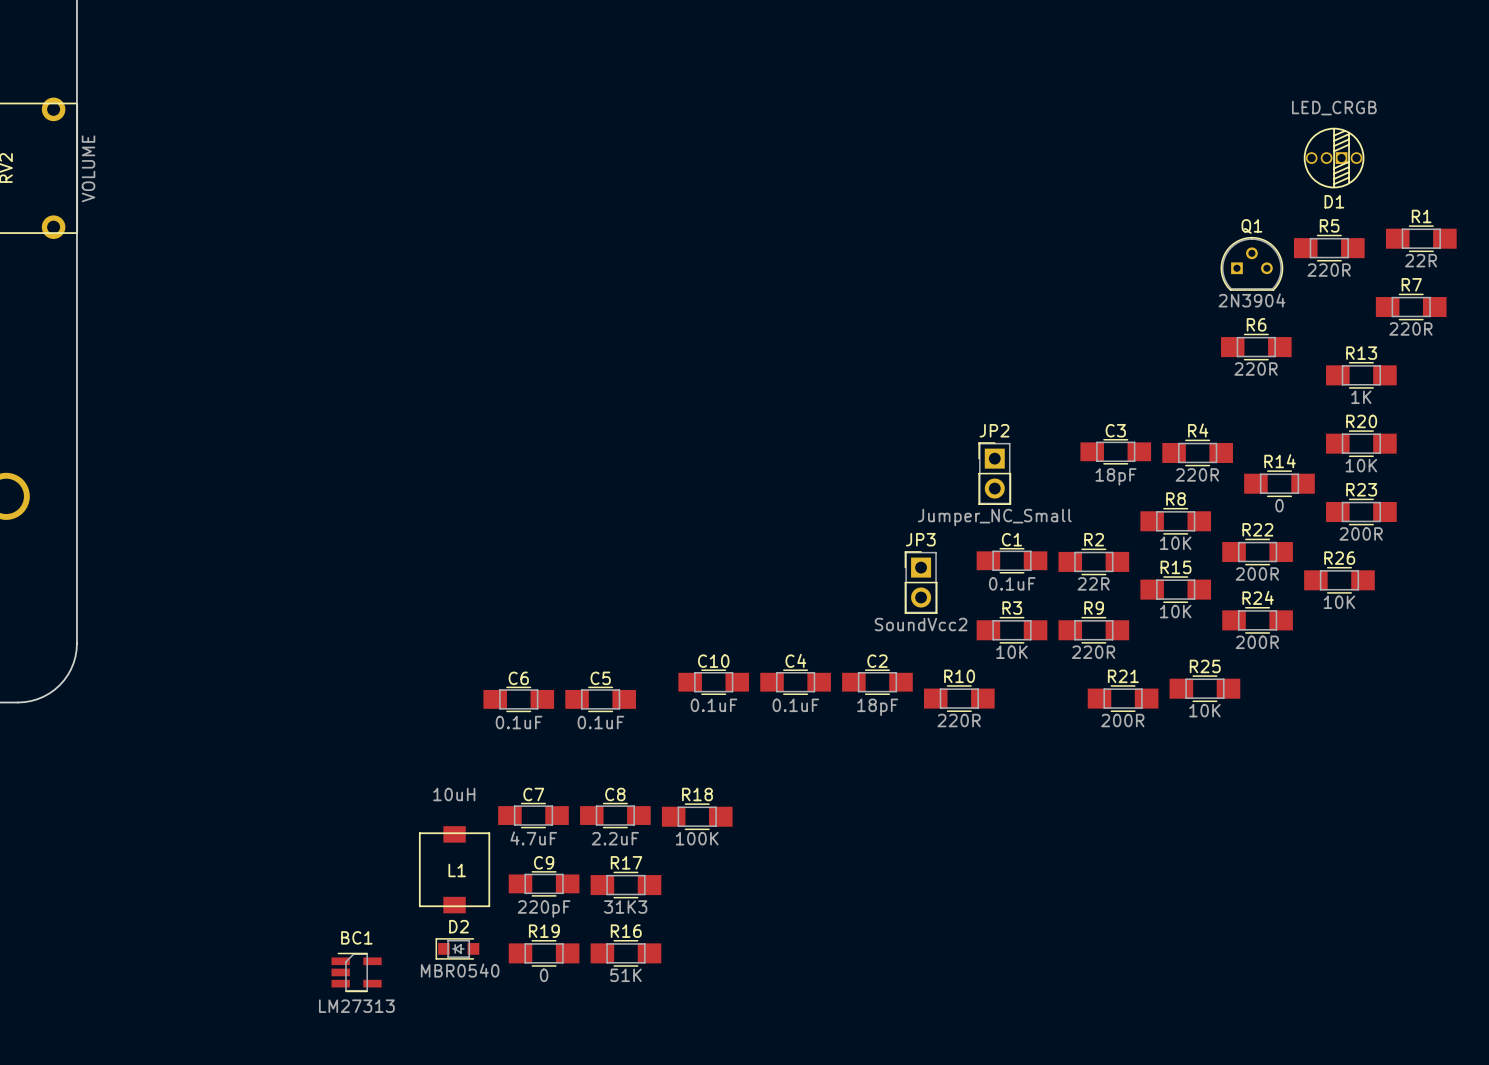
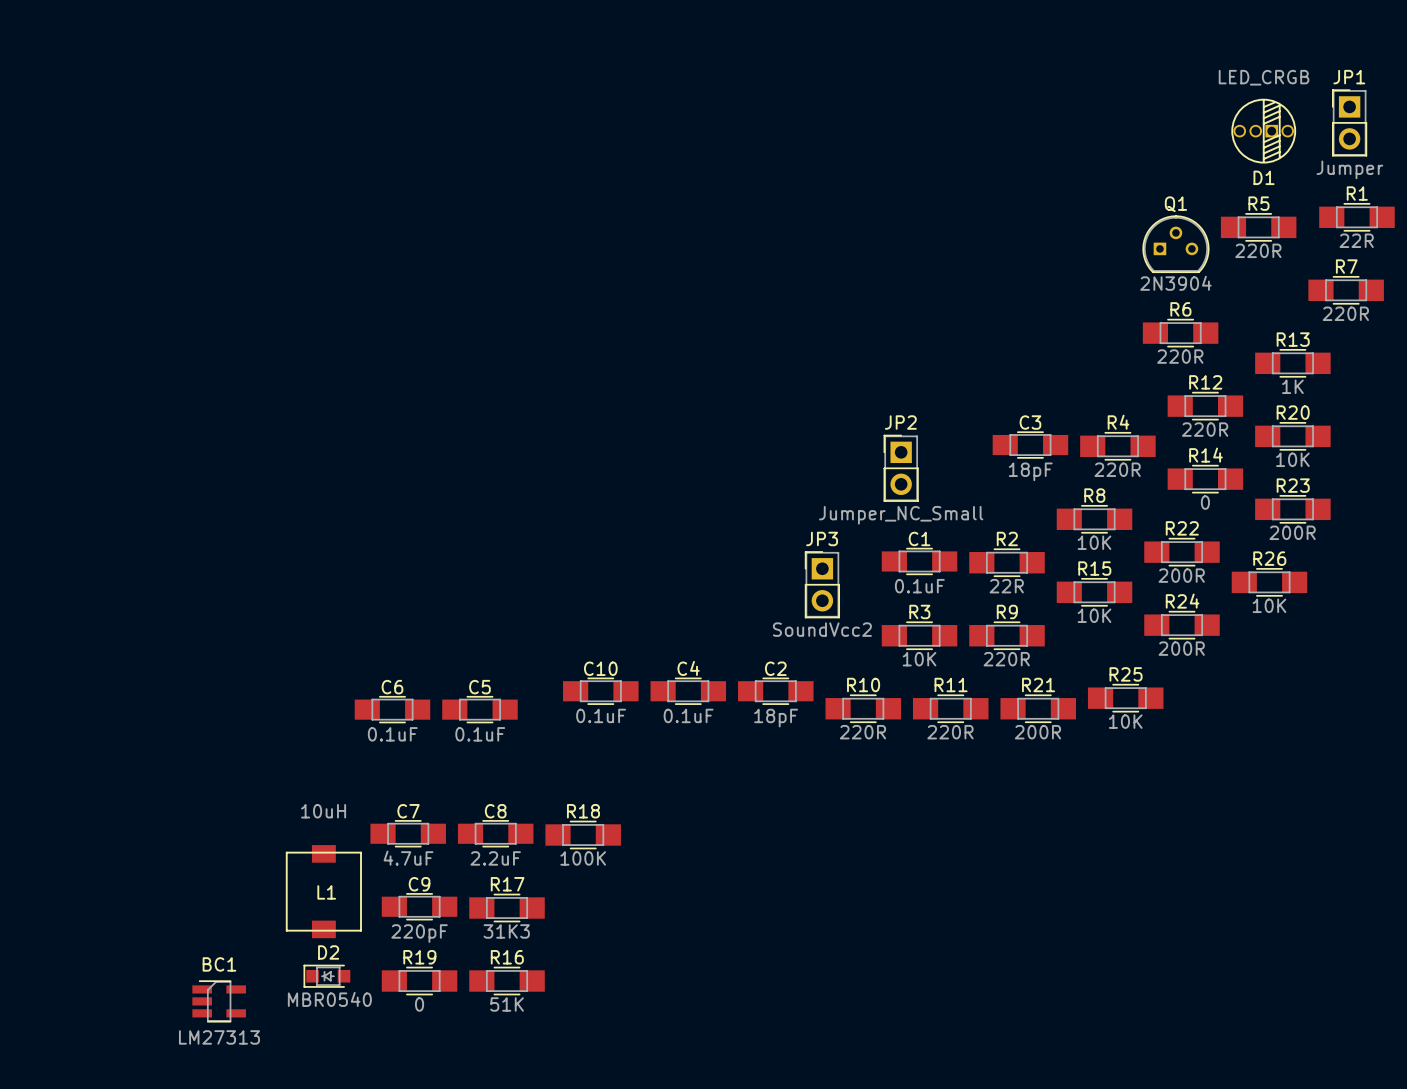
JP1: none -> Jumper (1349, 122)
R12: none -> 220R (1205, 406)
R11: none -> 220R (950, 708)

